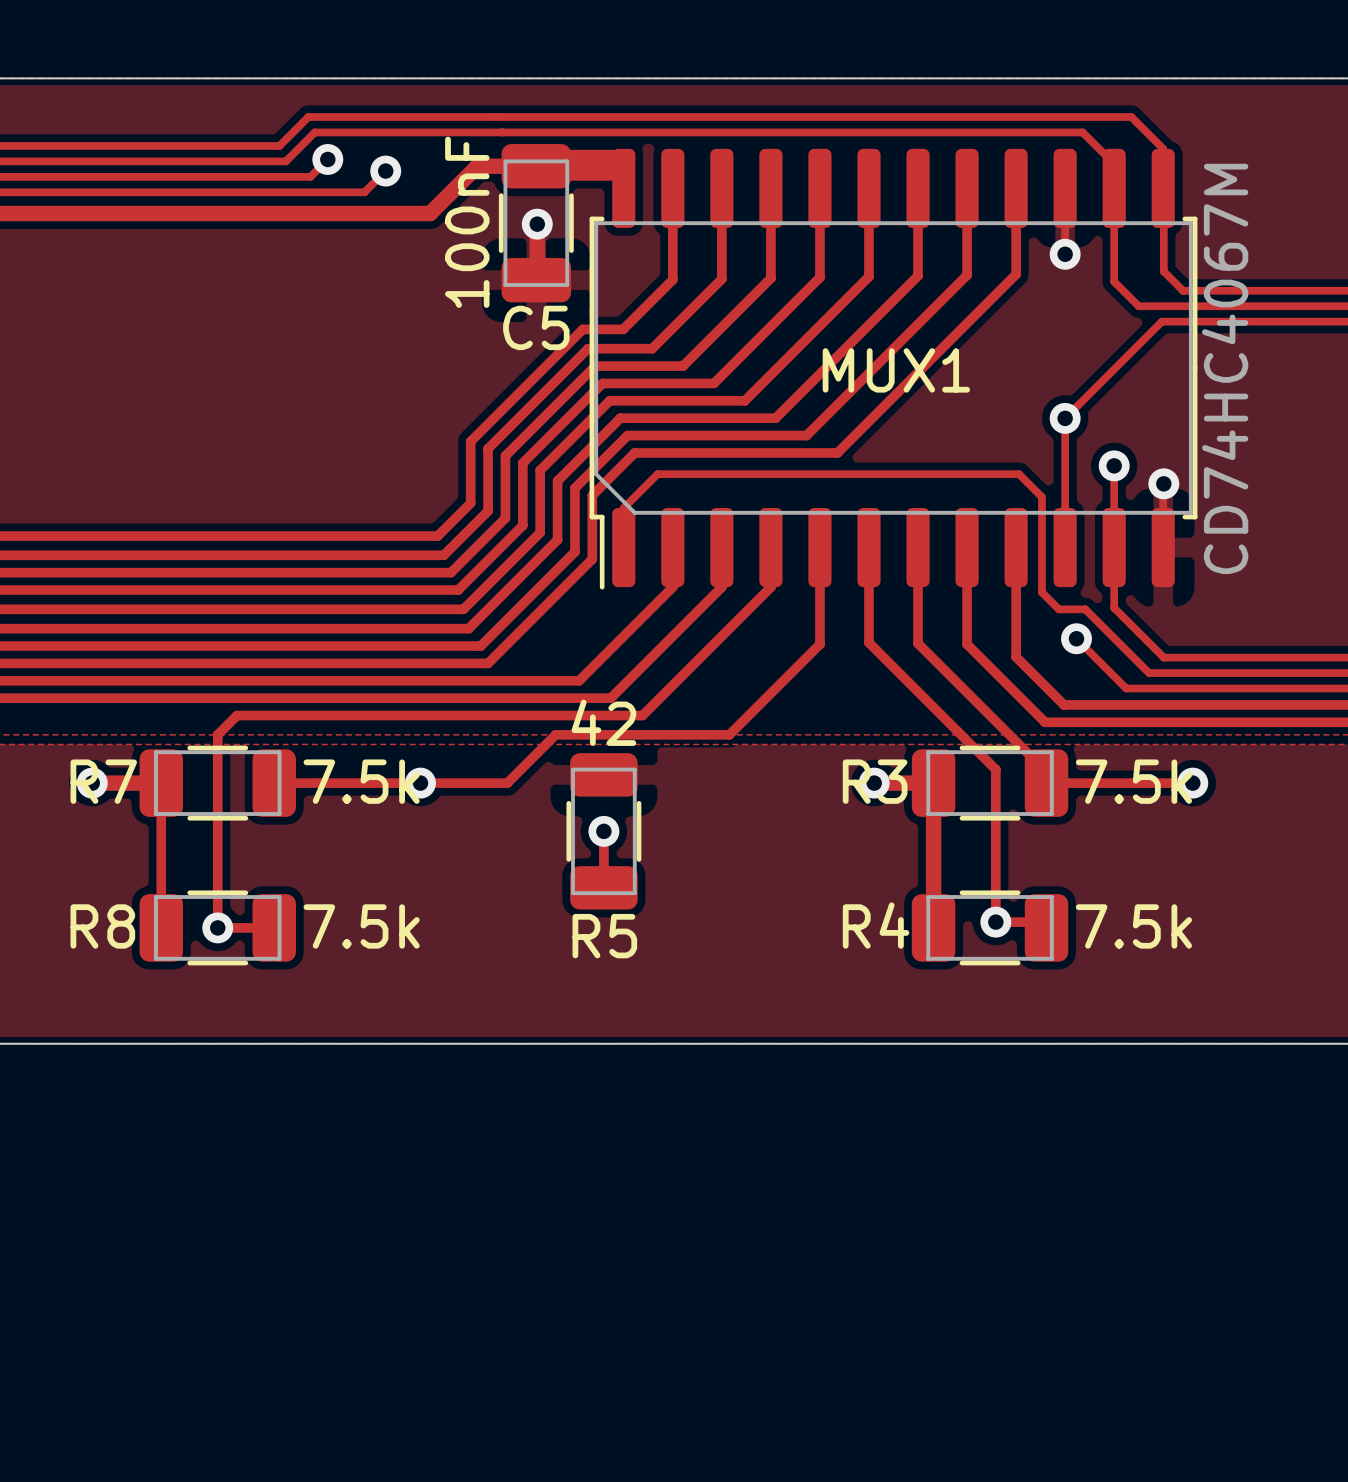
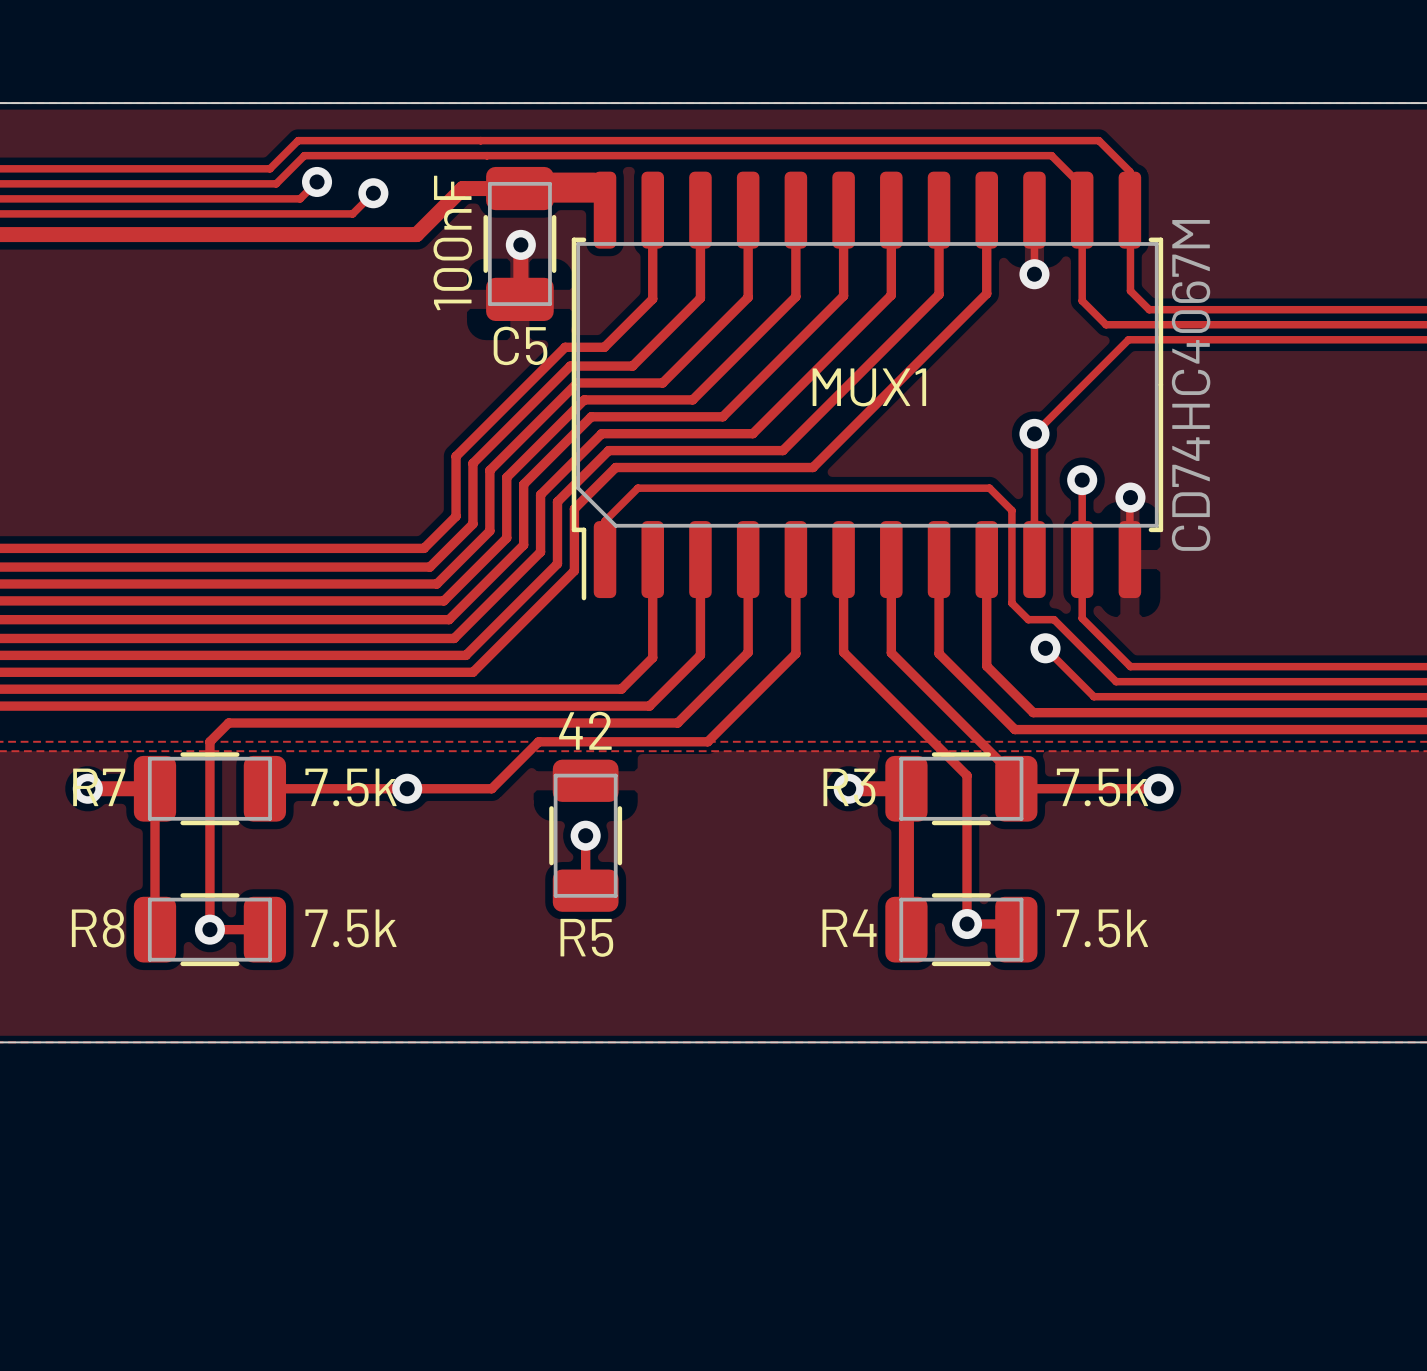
track: (672, 587) (579, 680) -> (652, 598) (652, 657) (621, 689) (561, 689)
track: (721, 587) (610, 698) -> (700, 598) (700, 655) (649, 706) (592, 706)
track: (770, 587) (642, 715) -> (748, 598) (748, 652) (677, 723) (623, 723)

